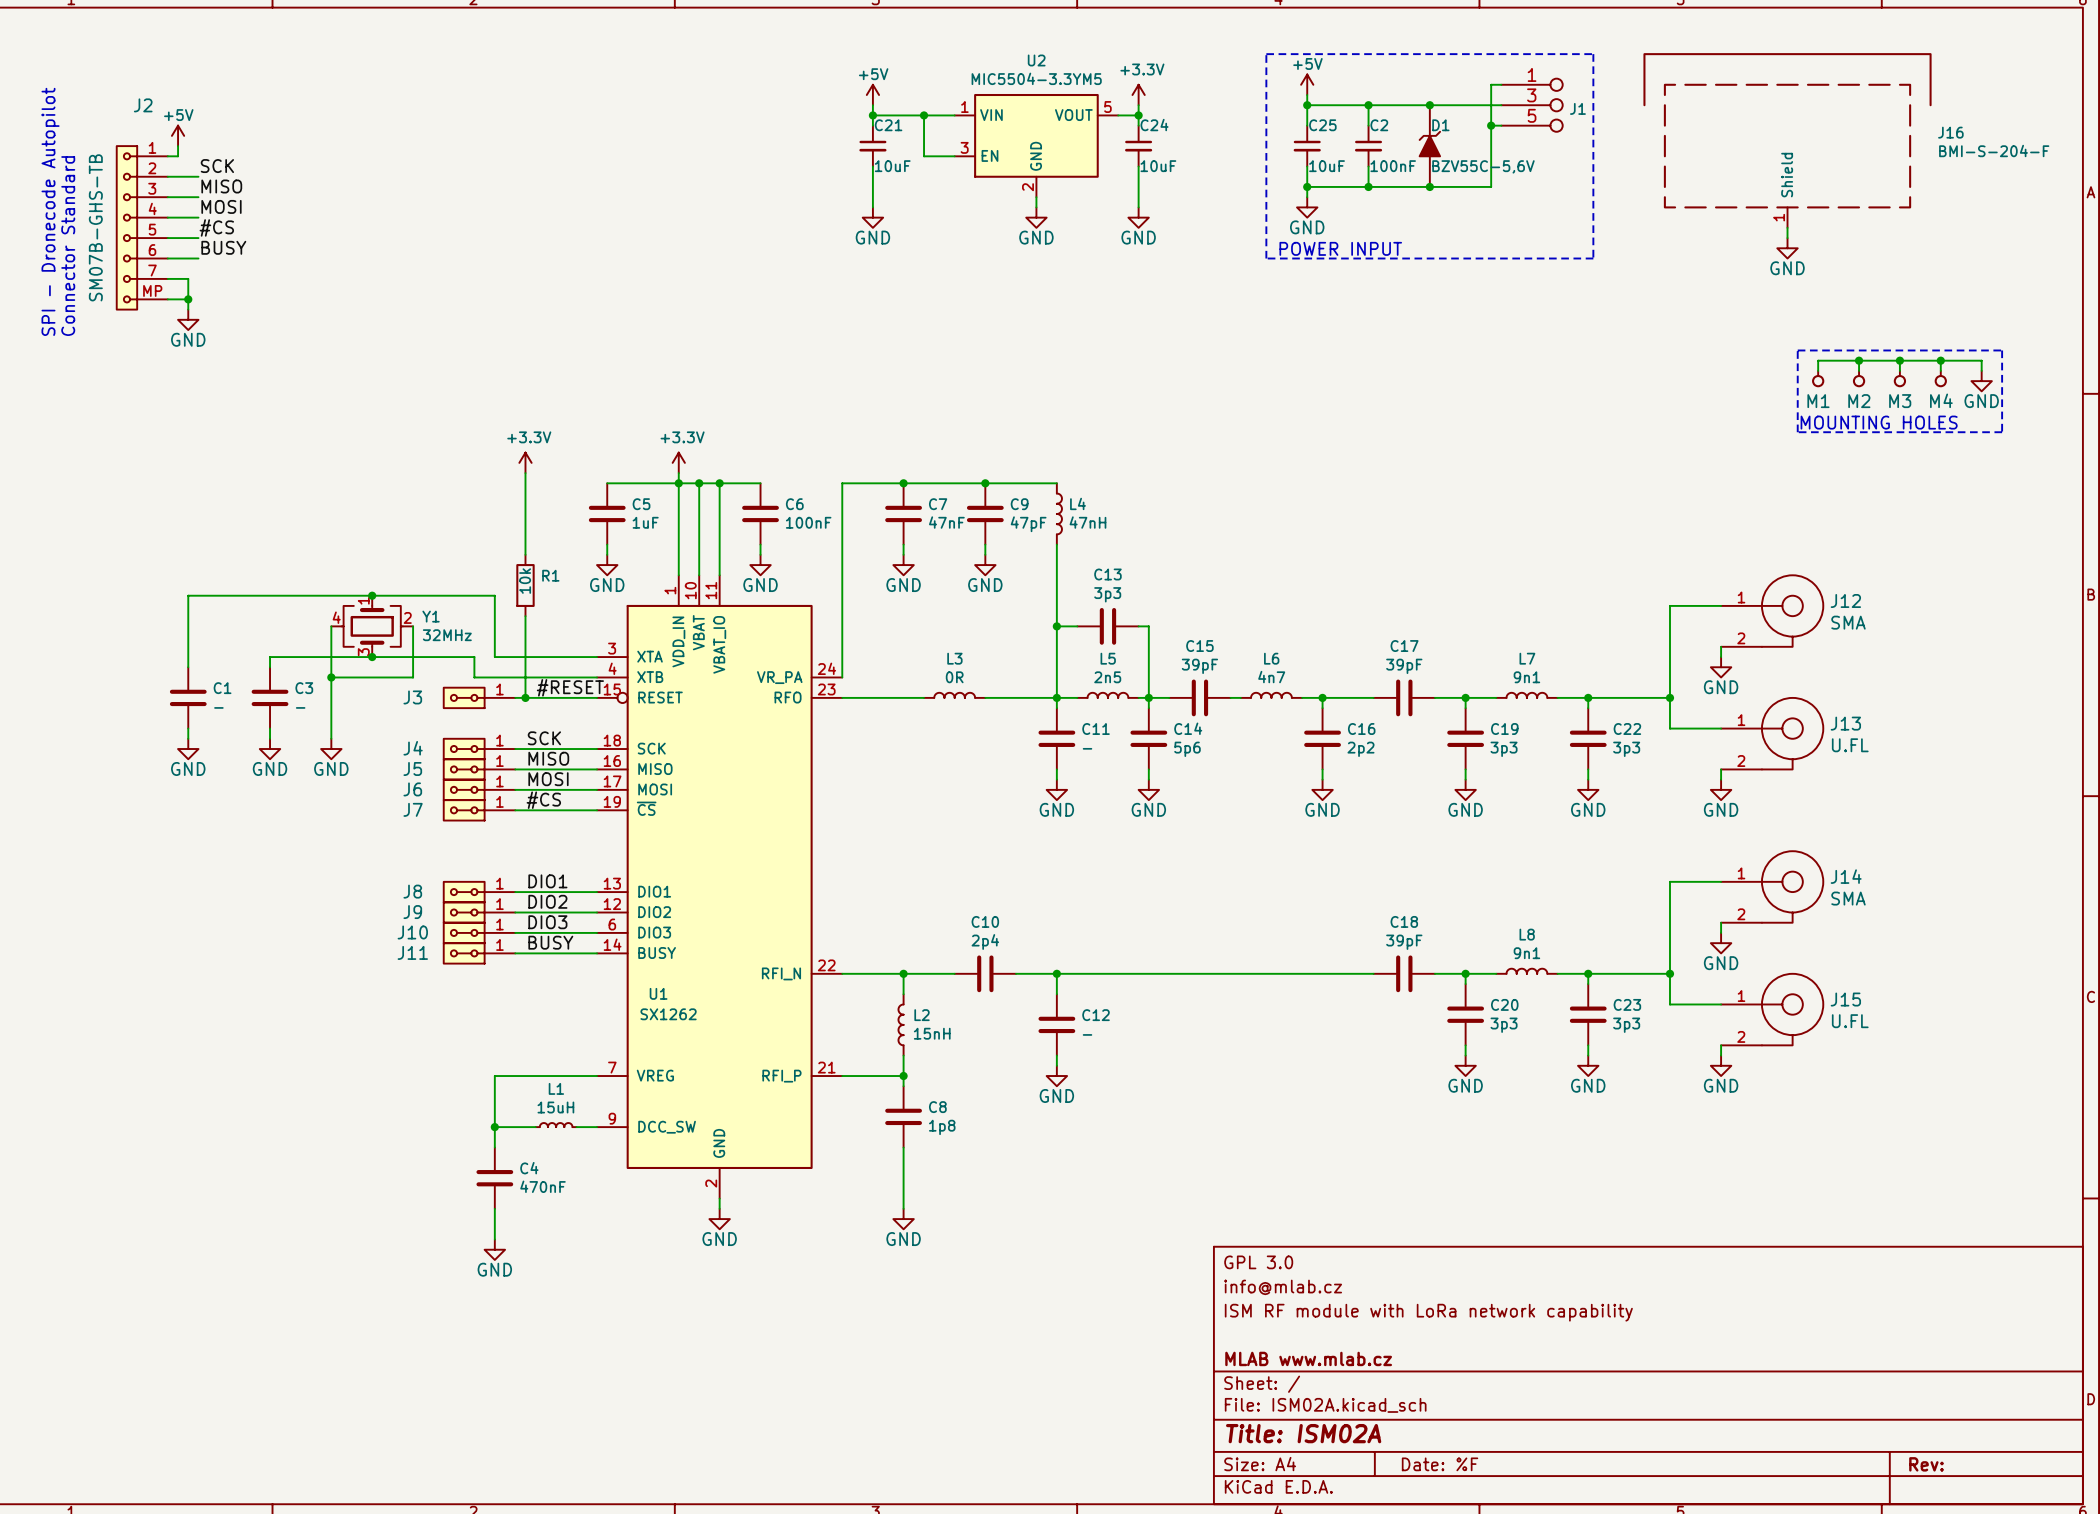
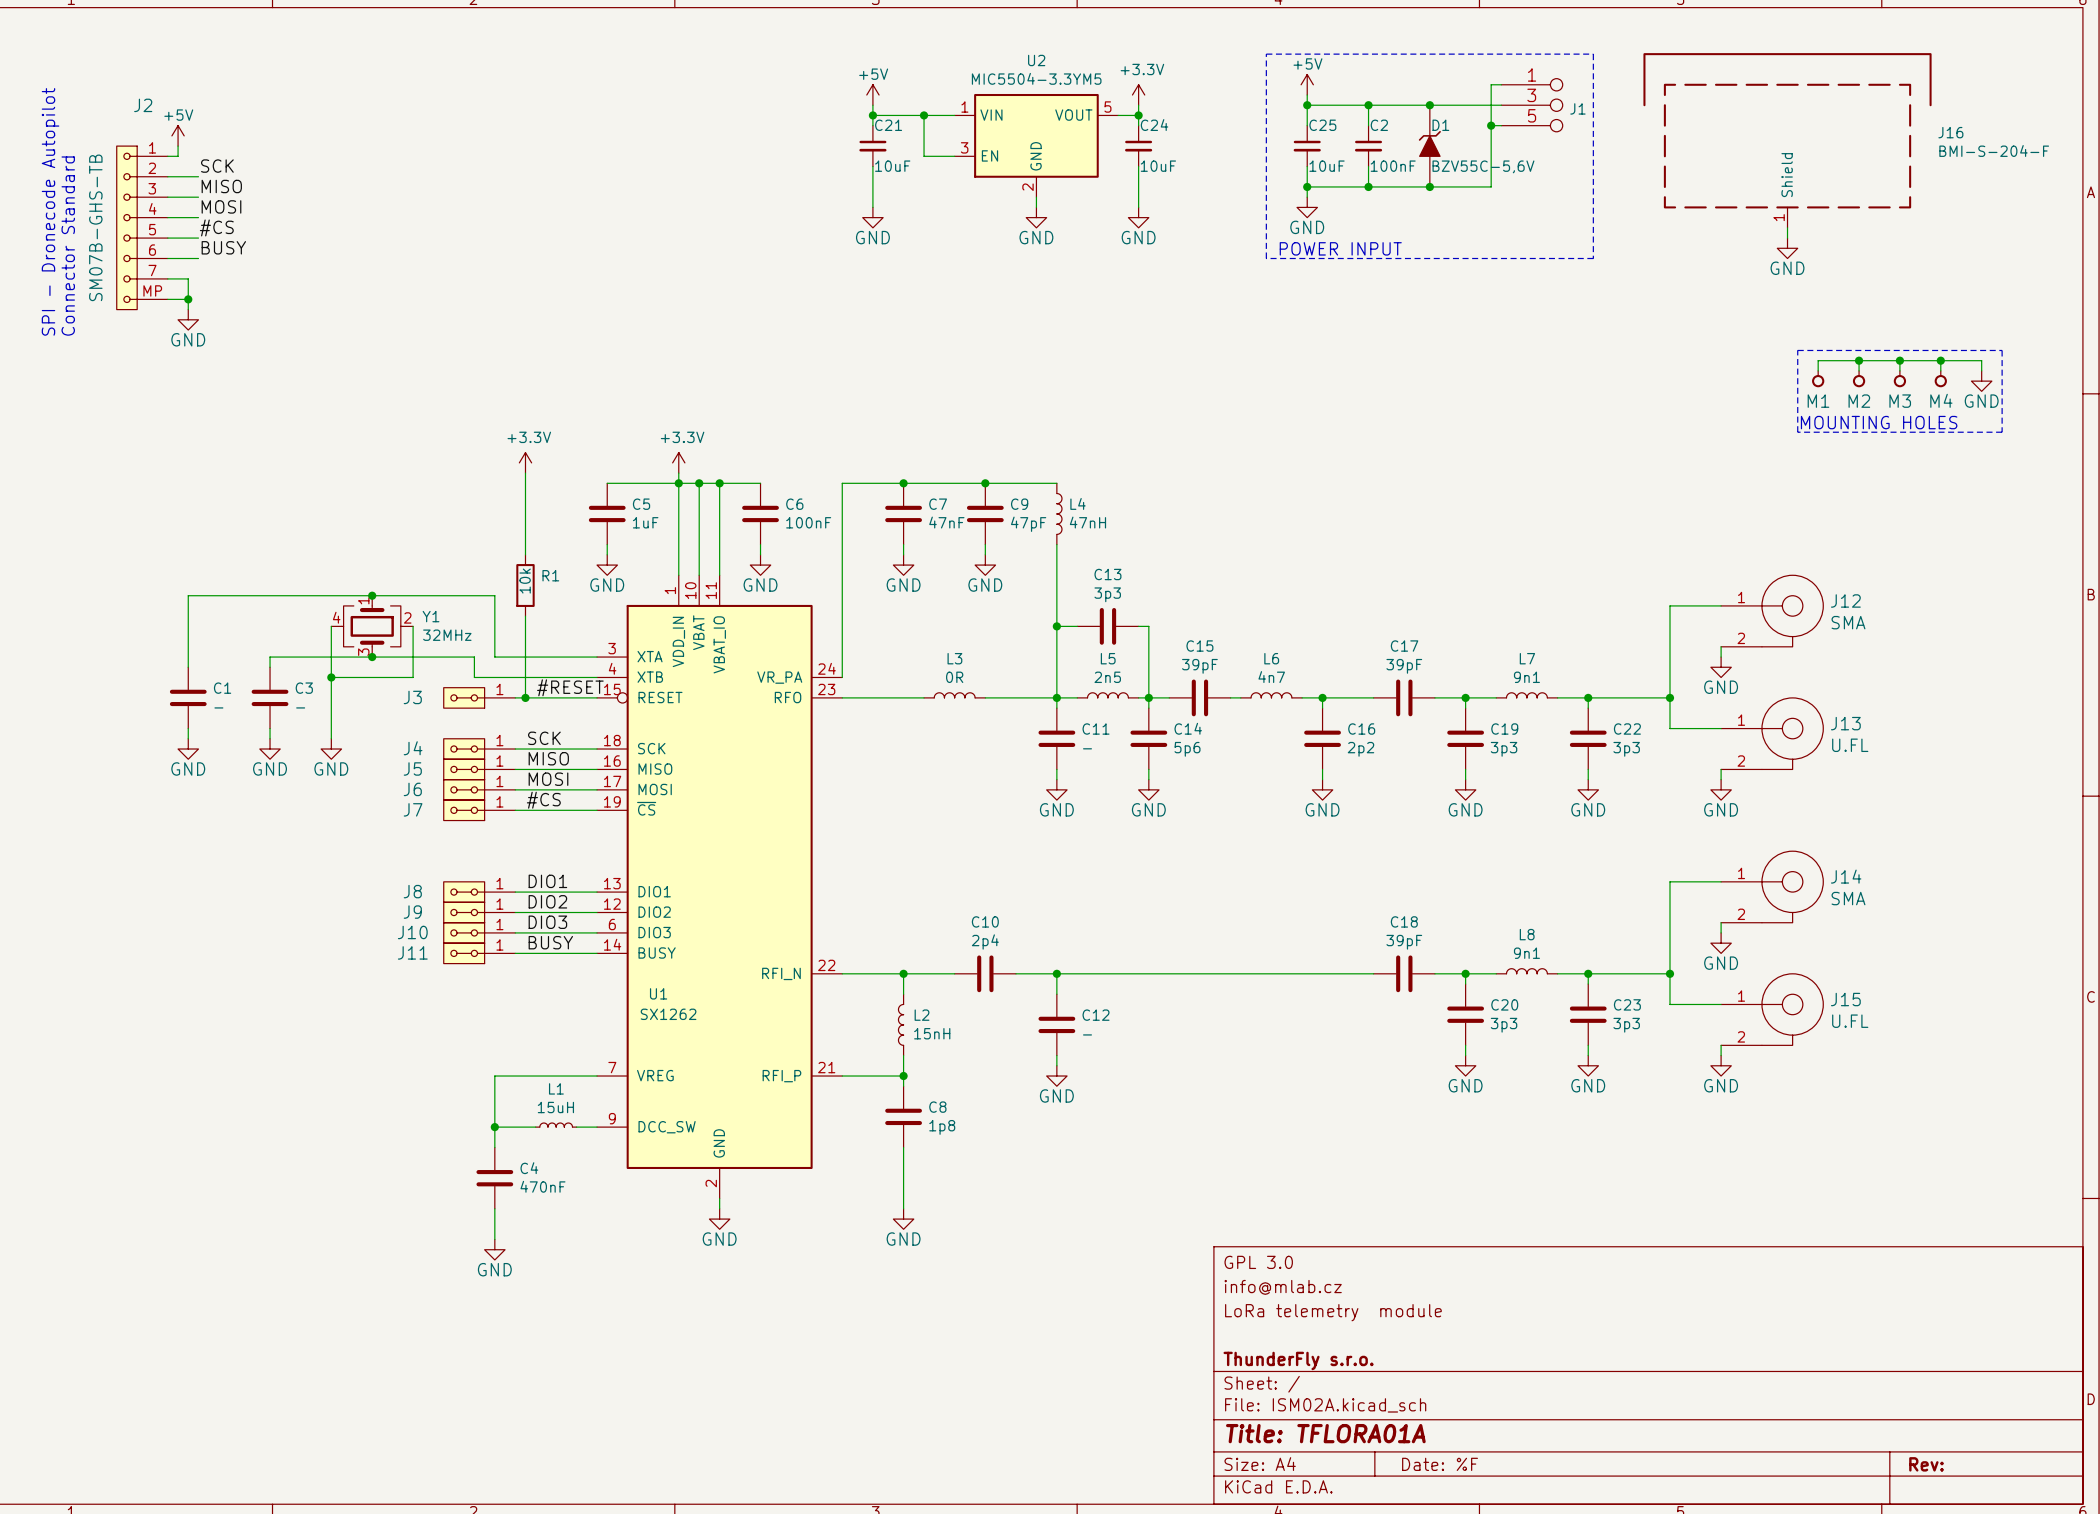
title block: ISM RF module with LoRa network capability (1428, 1312) -> LoRa telemetry module (1333, 1312)
title block: MLAB www.mlab.cz (1308, 1358) -> ThunderFly s.r.o. (1298, 1360)
title block: Title: ISM02A (1303, 1433) -> Title: TFLORA01A (1325, 1433)

